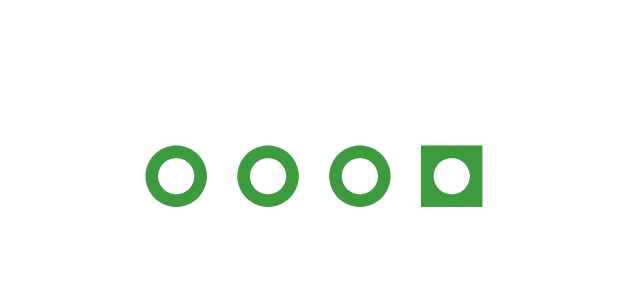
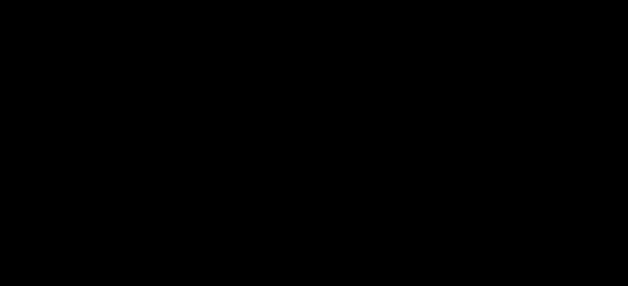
part: (313, 176) -> none

